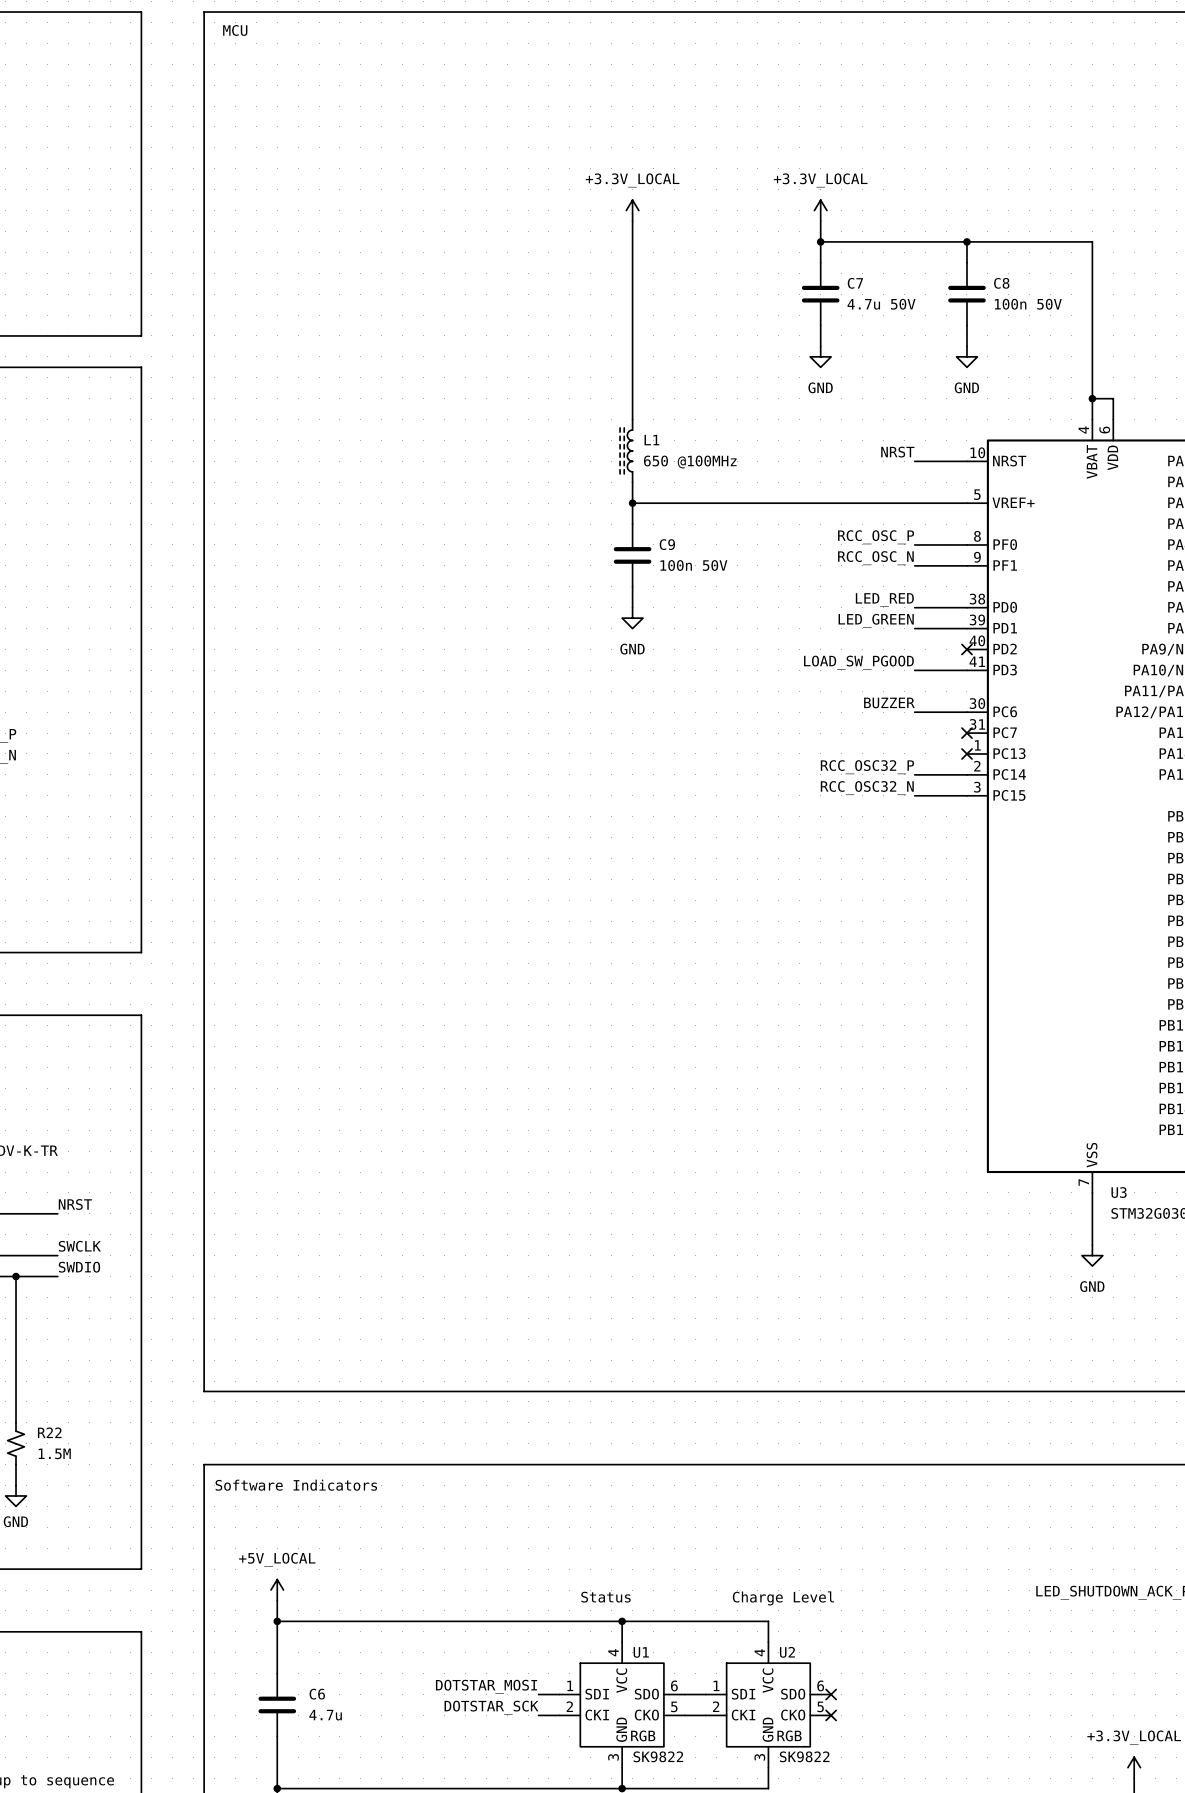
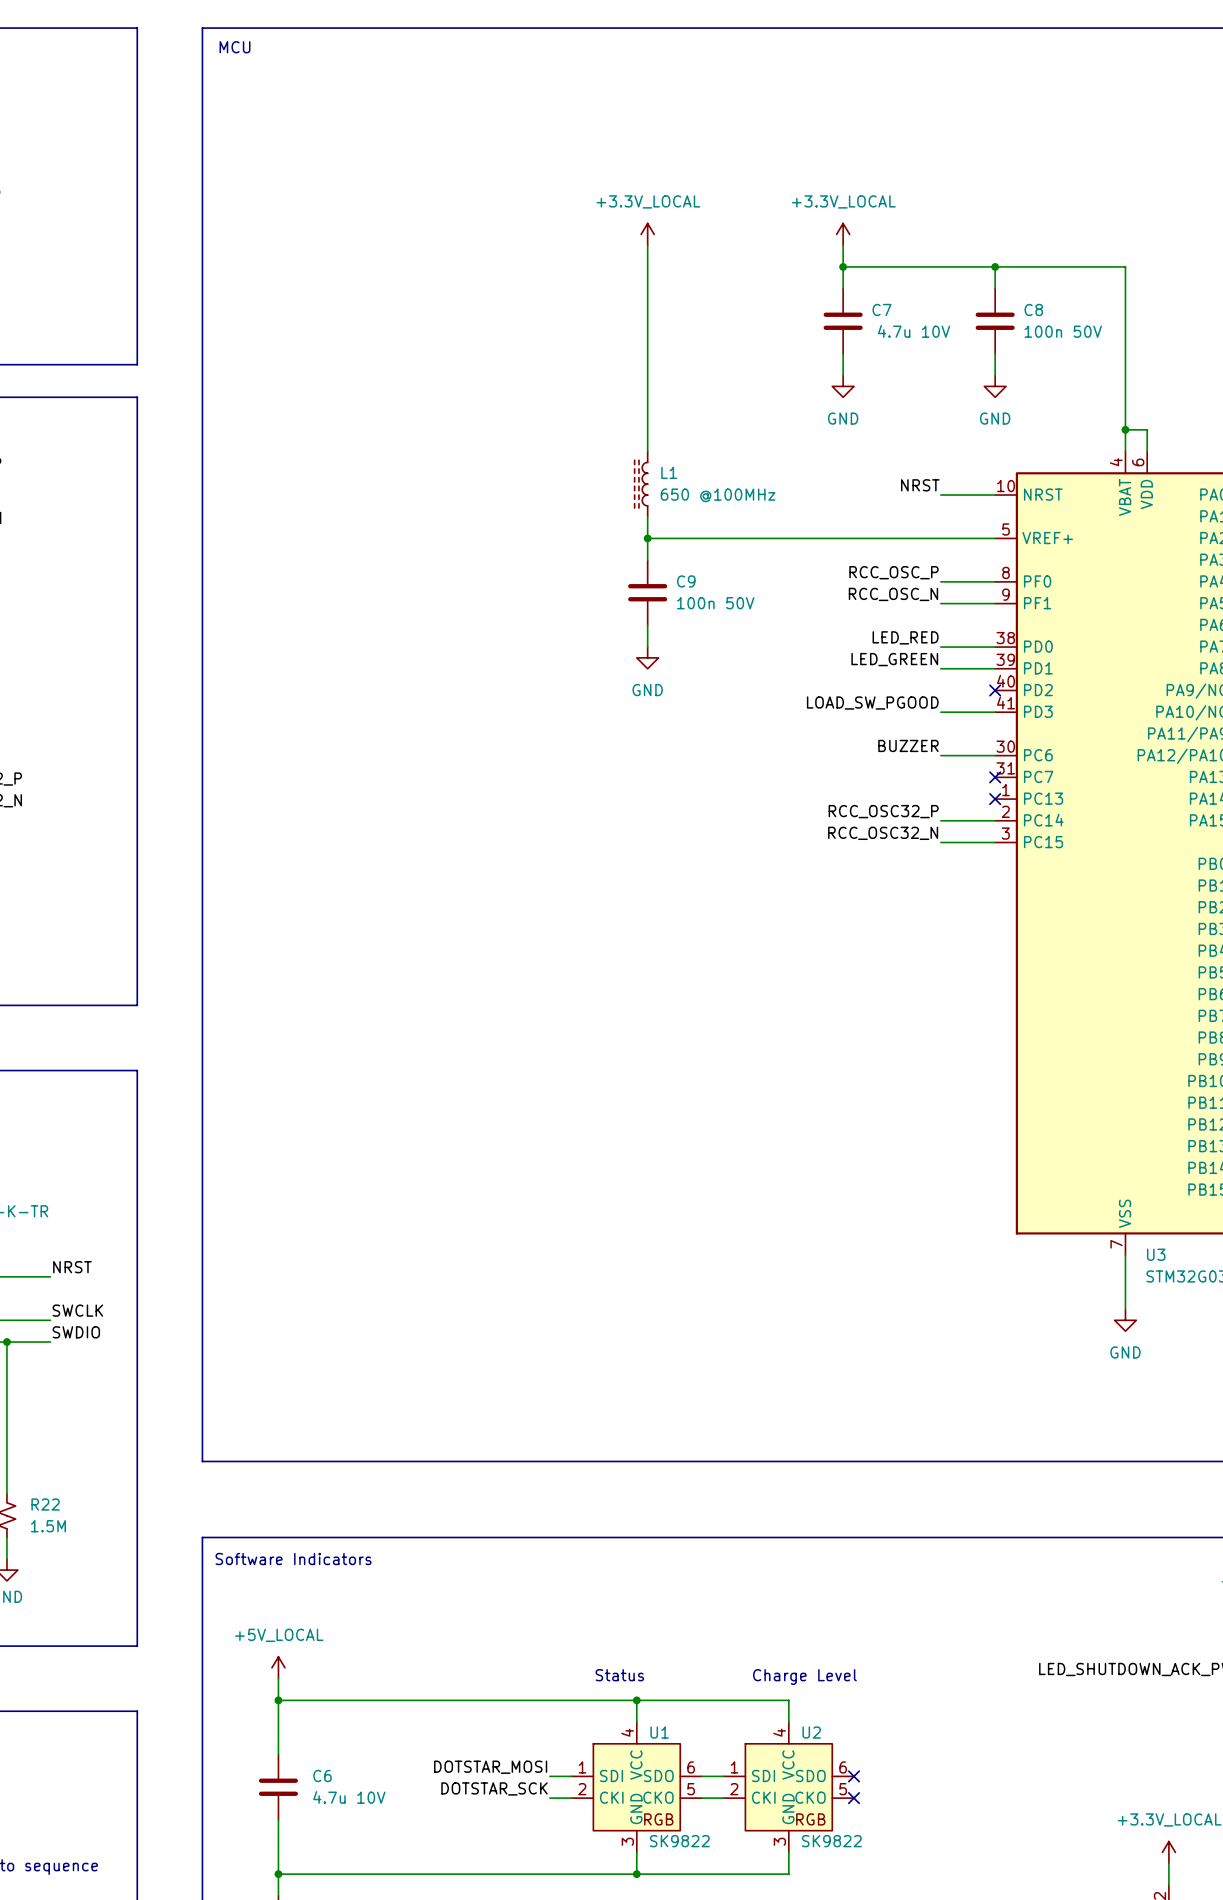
C7 value: 4.7u 50V (881, 304) -> 4.7u 10V (914, 331)
C6 value: 4.7u (325, 1715) -> 4.7u 10V (349, 1797)

